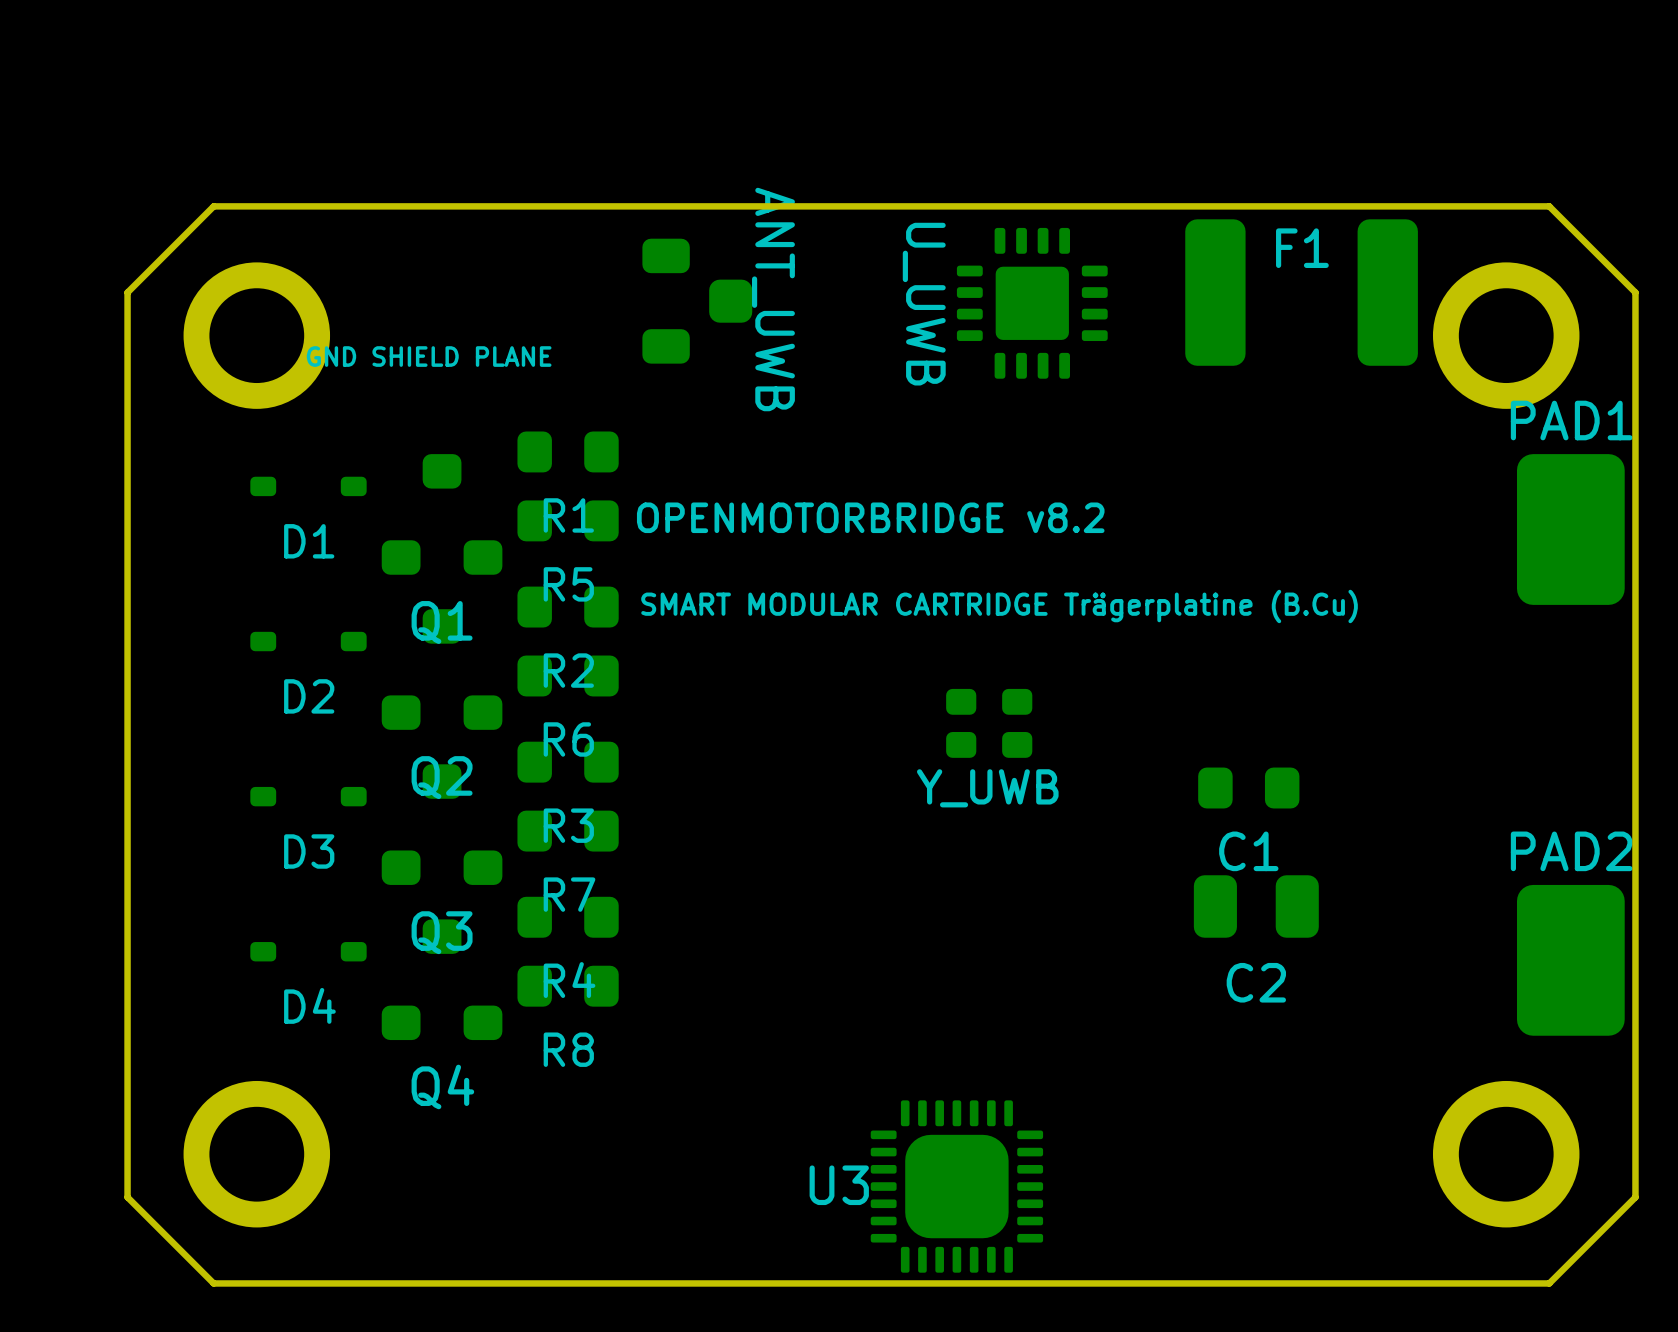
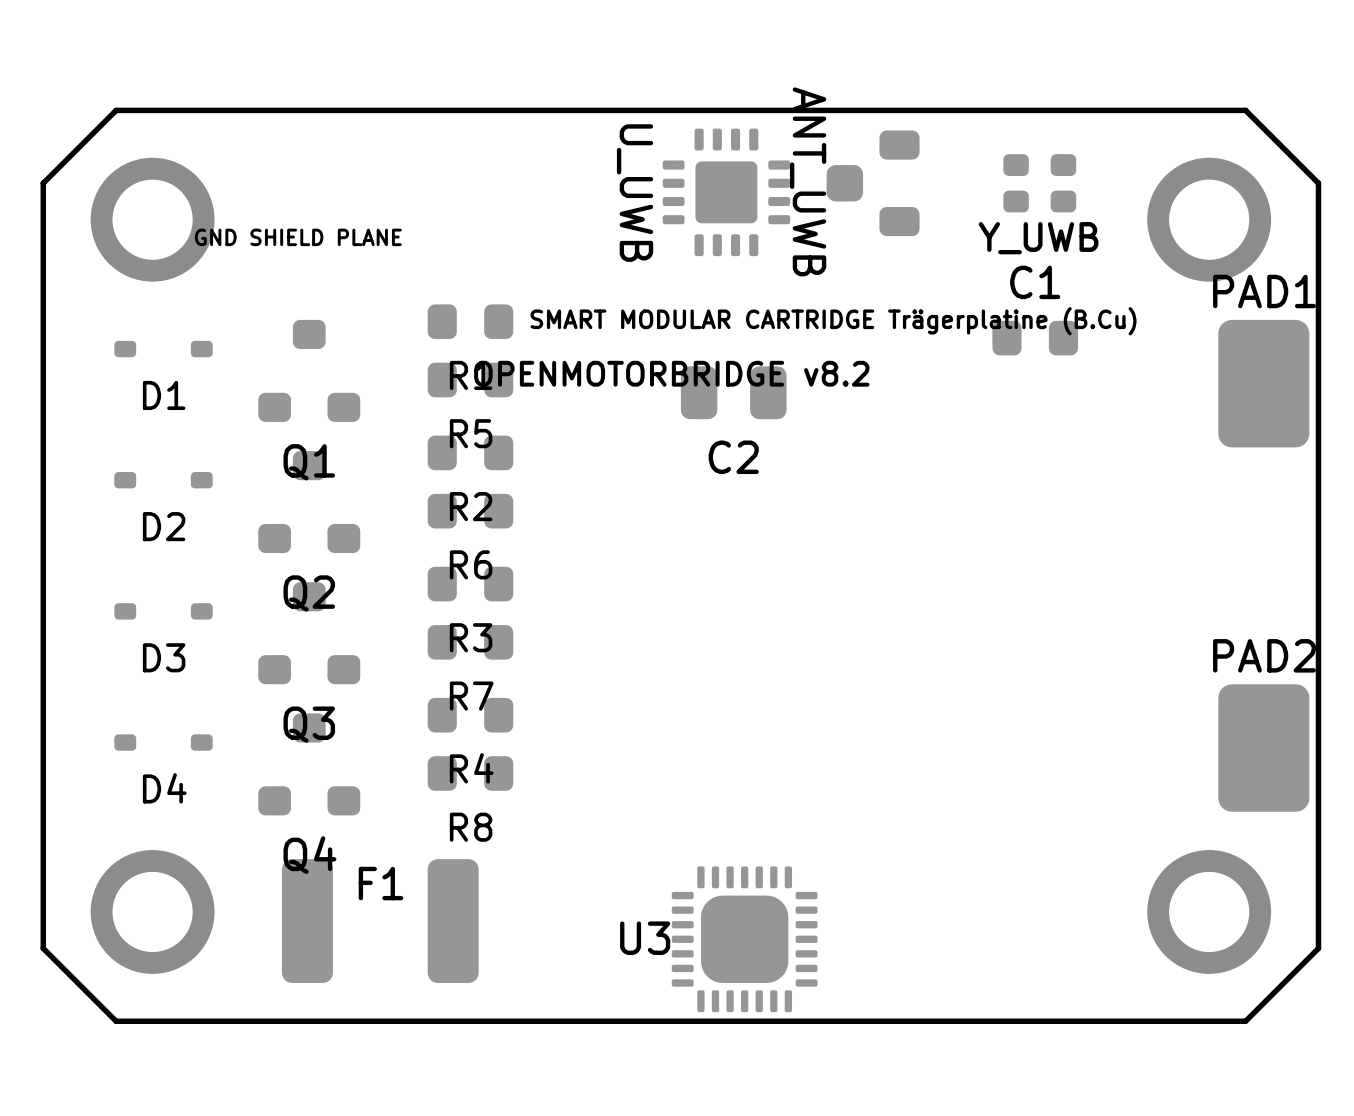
F1 position: (1301, 292) -> (380, 921)
ANT_UWB rotation: 0° (697, 301) -> 180° (873, 183)
ANT_UWB position: (697, 301) -> (873, 183)
U_UWB position: (1032, 303) -> (726, 192)
R1 position: (568, 451) -> (470, 321)
D1 position: (308, 486) -> (163, 349)
R5 position: (568, 520) -> (470, 380)
text position: SMART MODULAR CARTRIDGE Trägerplatine (B.Cu) (999, 606) -> SMART MODULAR CARTRIDGE Trägerplatine (B.Cu) (833, 321)
R2 position: (568, 607) -> (470, 452)
D2 position: (308, 641) -> (163, 480)
R6 position: (568, 675) -> (470, 511)
Y_UWB position: (989, 723) -> (1039, 183)
R3 position: (568, 762) -> (470, 584)
C1 position: (1248, 788) -> (1035, 338)
D3 position: (308, 796) -> (163, 611)
R7 position: (568, 831) -> (470, 642)
C1 name position: C1 (1248, 851) -> C1 (1035, 282)
C2 position: (1256, 906) -> (733, 392)
R4 position: (568, 917) -> (470, 715)
D4 position: (308, 951) -> (163, 742)
R8 position: (568, 986) -> (470, 773)

